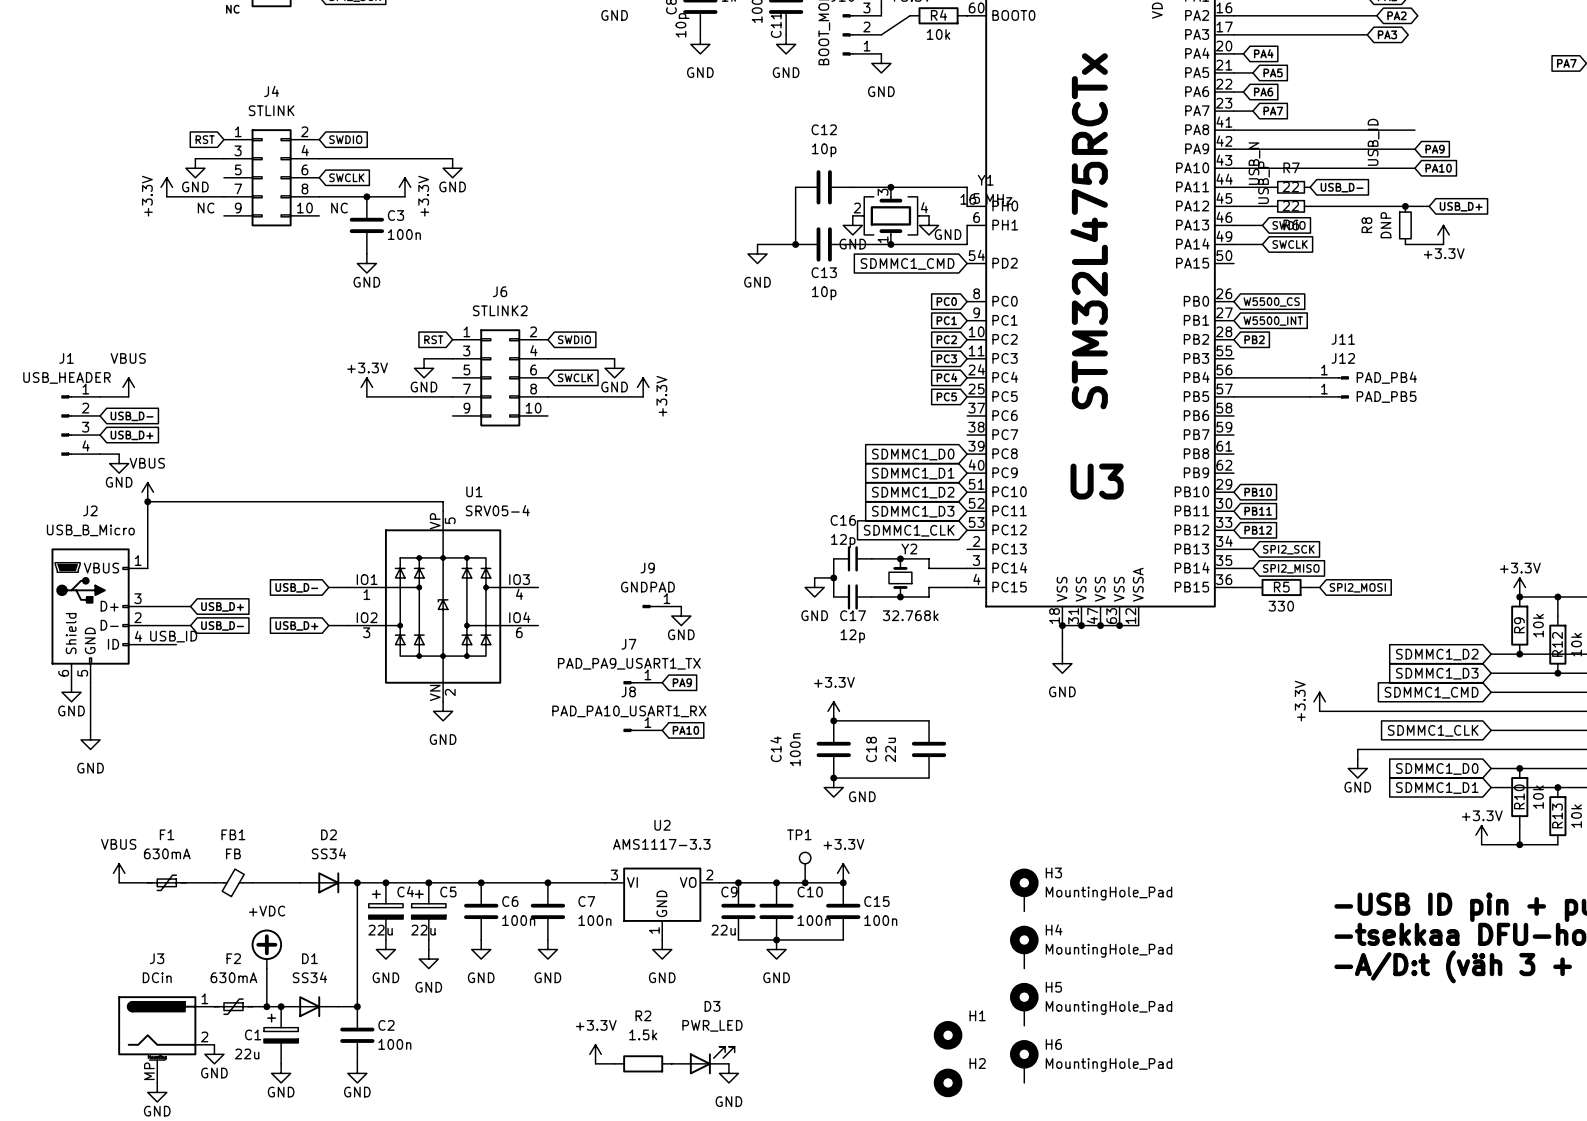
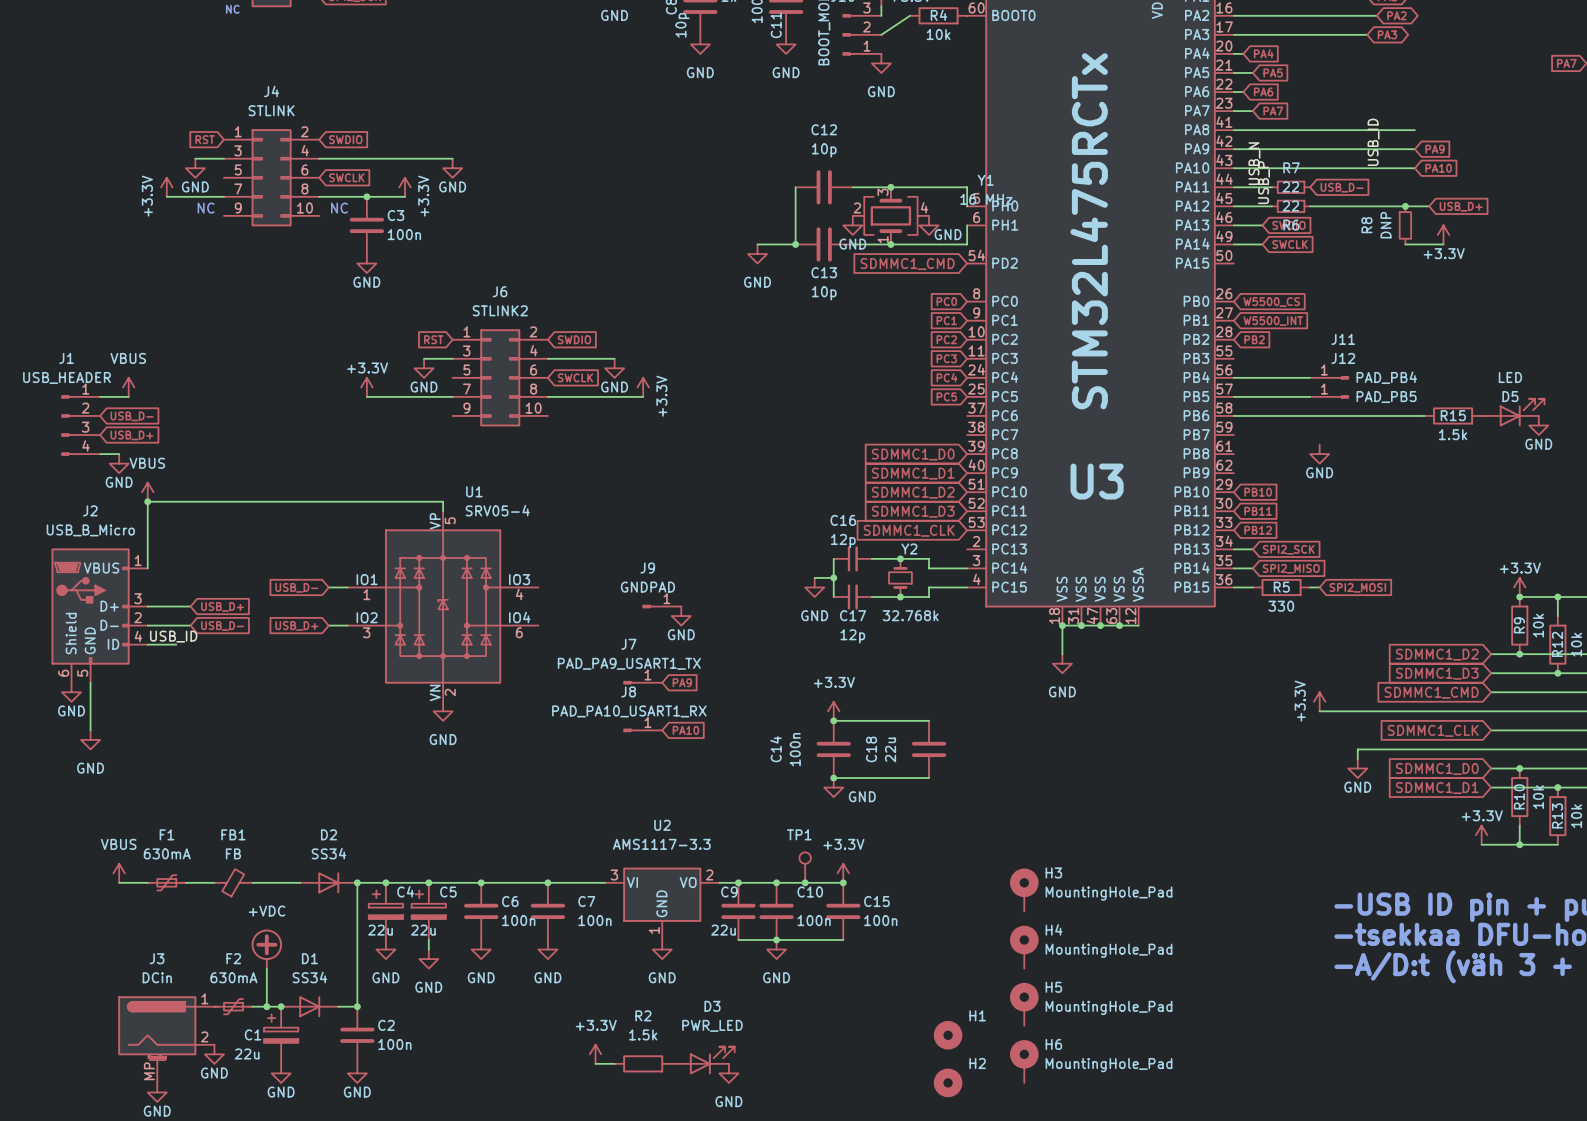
D5: none -> LED (1513, 412)
wire: none -> (1233, 415) (1424, 415)
R15: none -> 1.5k (1453, 415)
power symbol: none -> GND (1538, 425)
power symbol: none -> GND (1319, 454)

